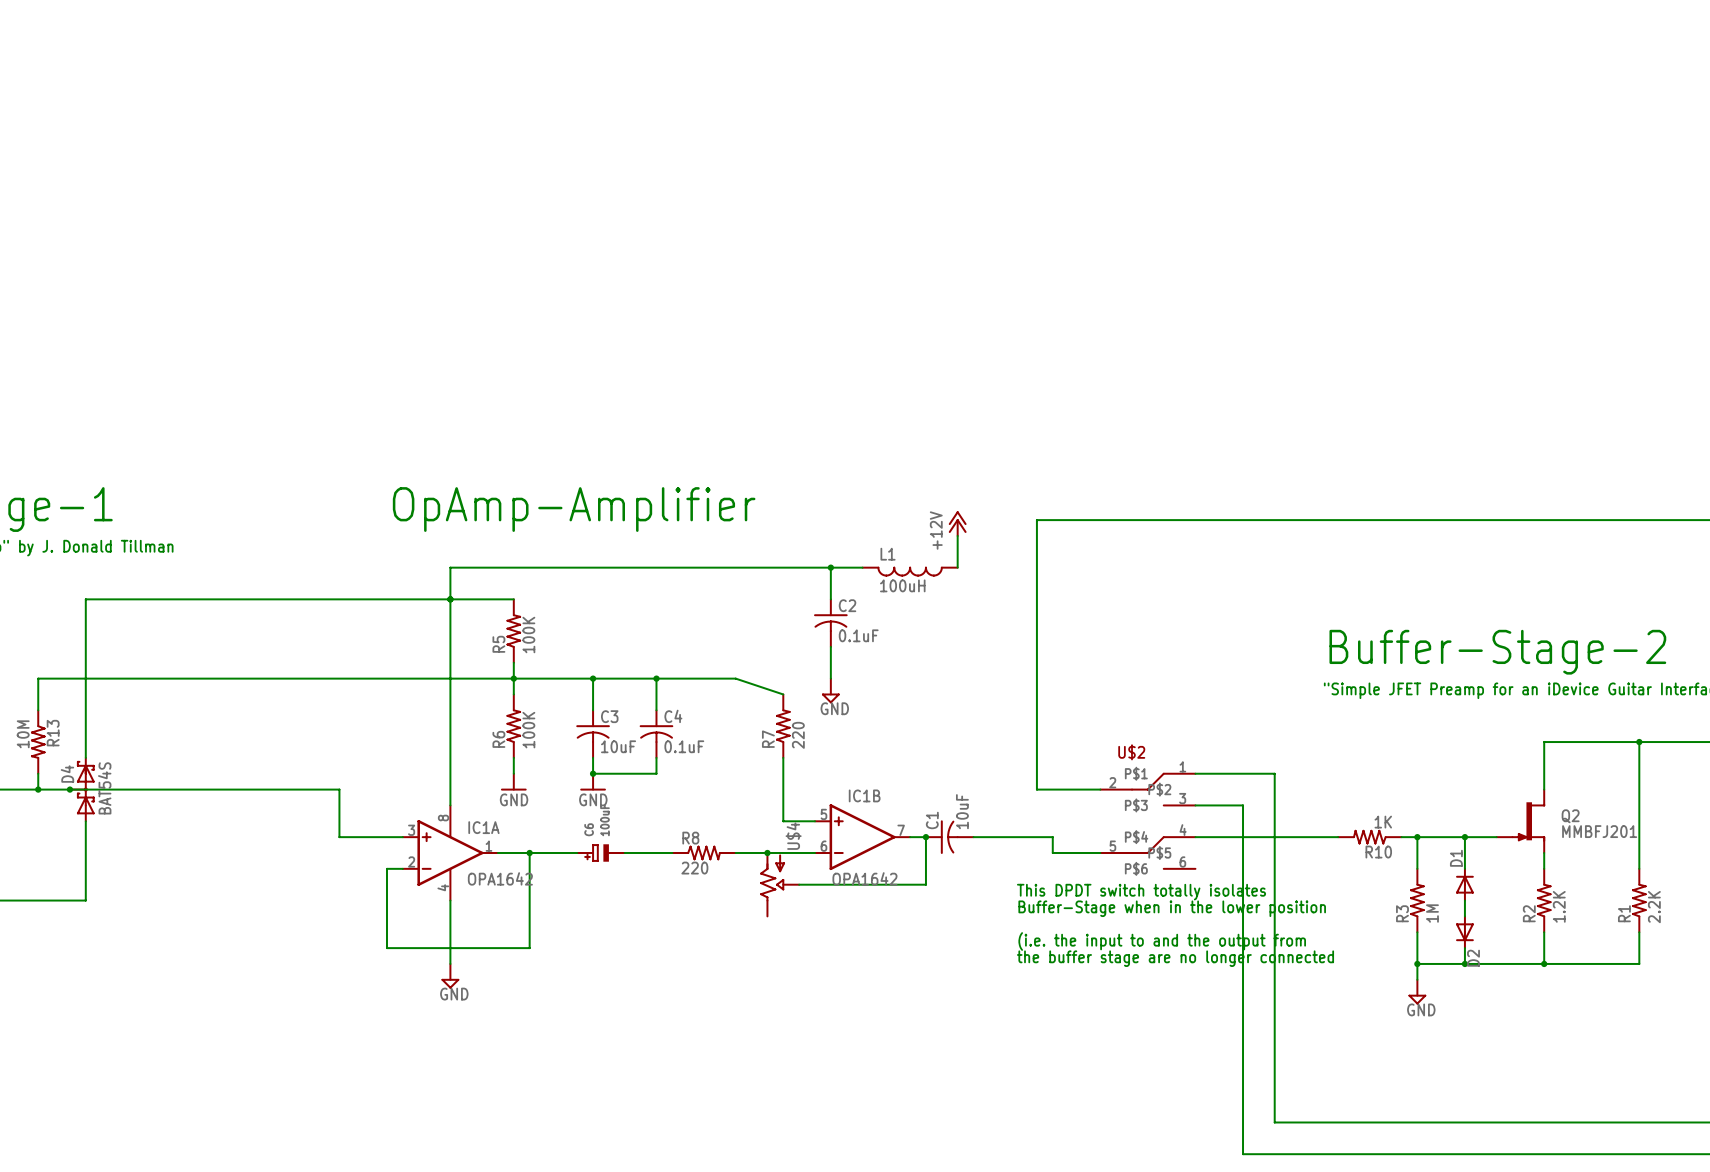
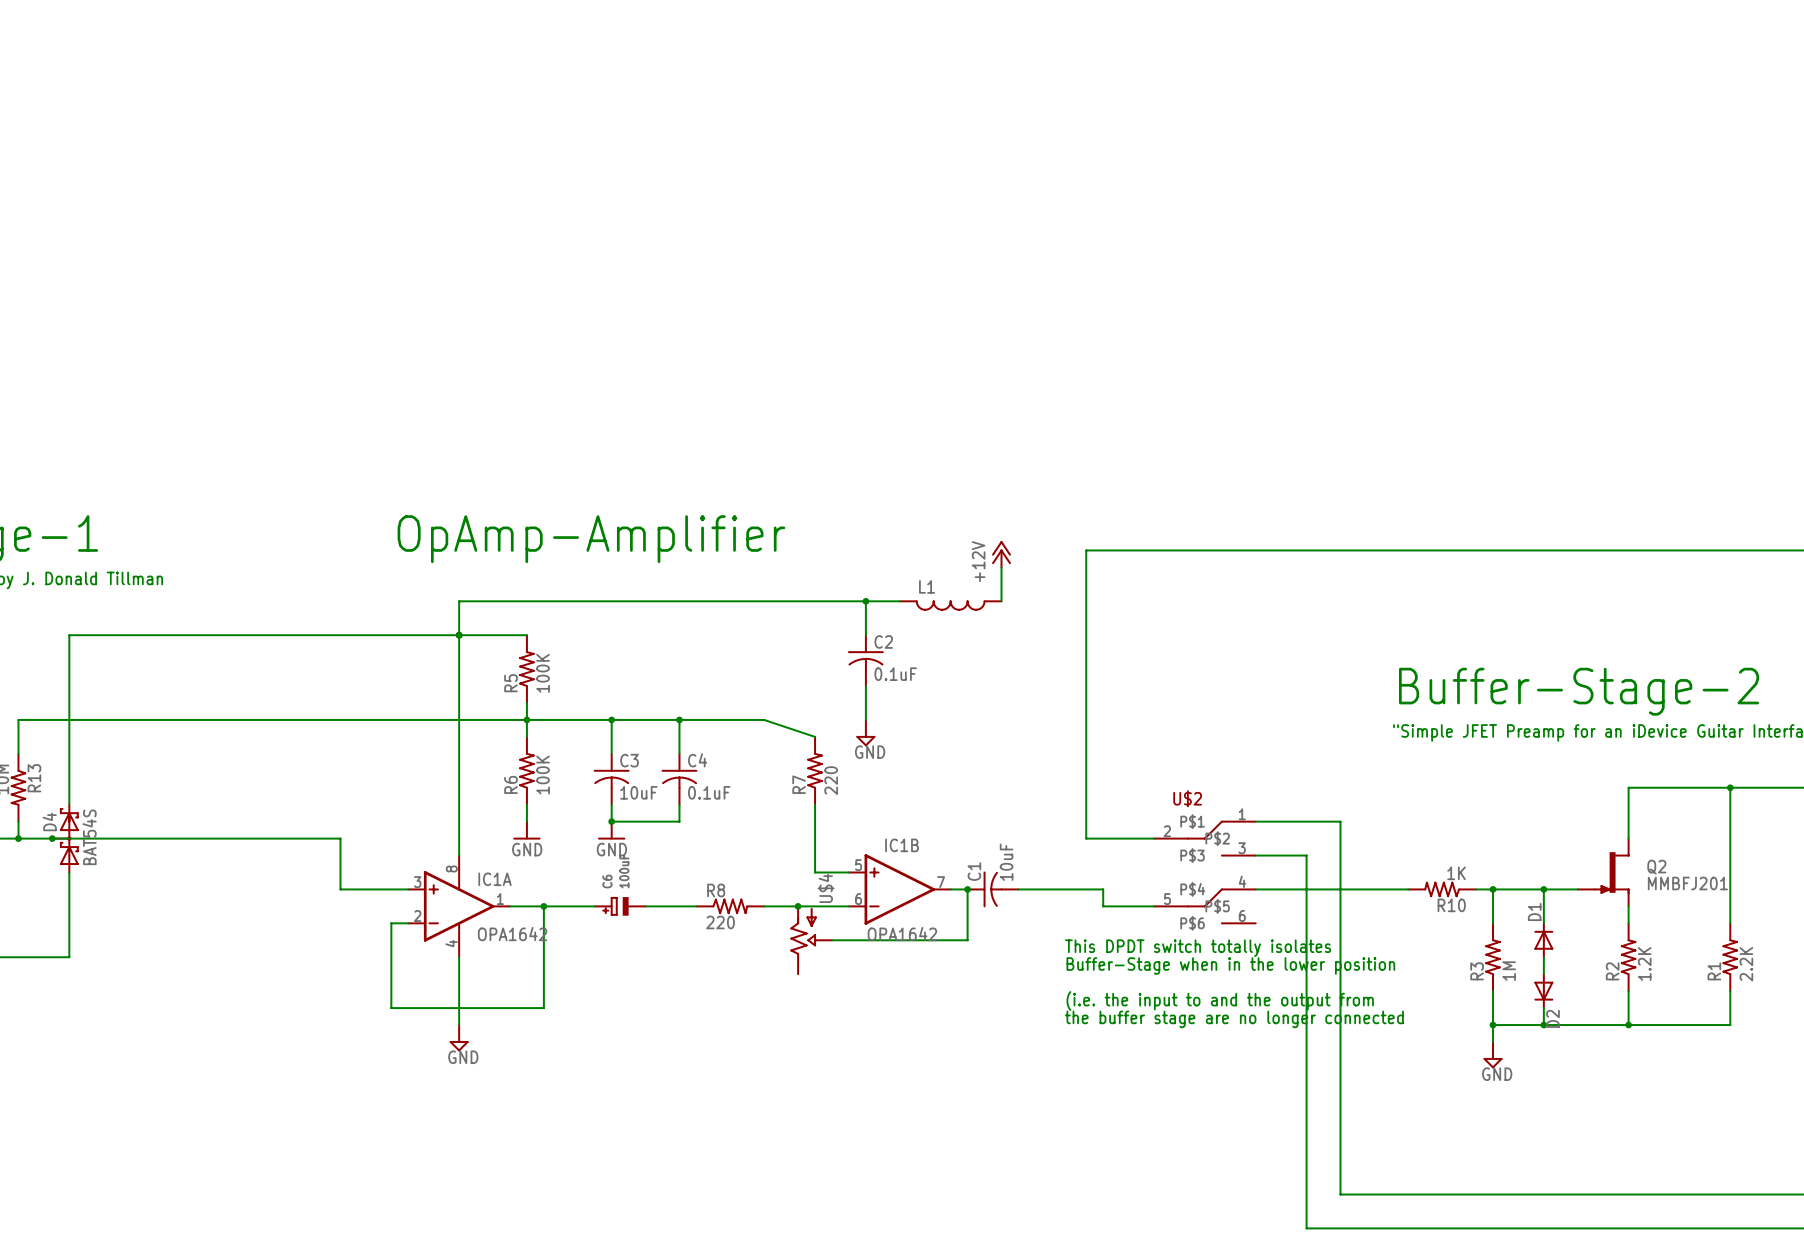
L1 value: 100uH (902, 585) -> none

